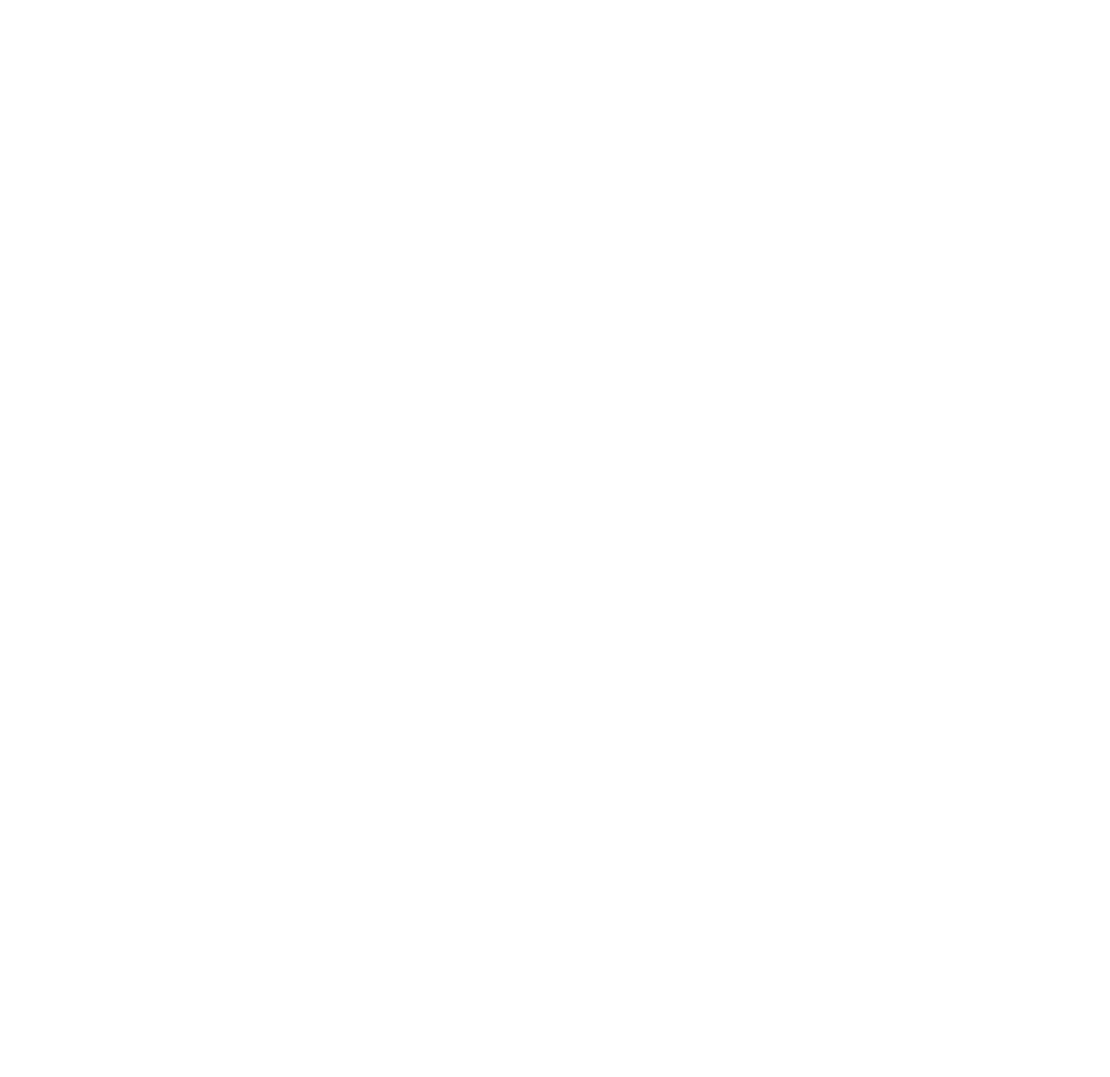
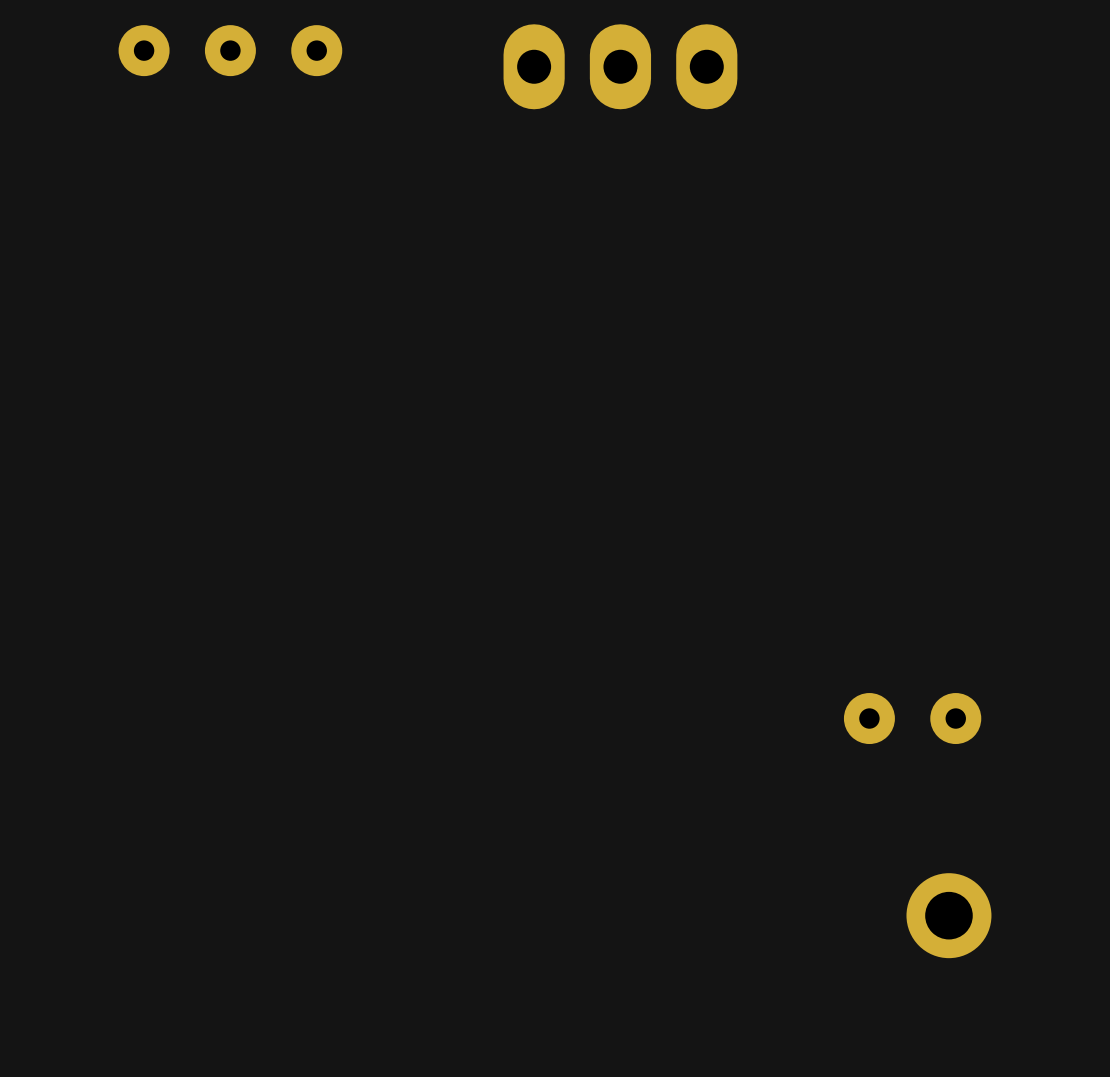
part: none -> (230, 50)
part: none -> (620, 66)
part: none -> (912, 718)
part: none -> (948, 915)

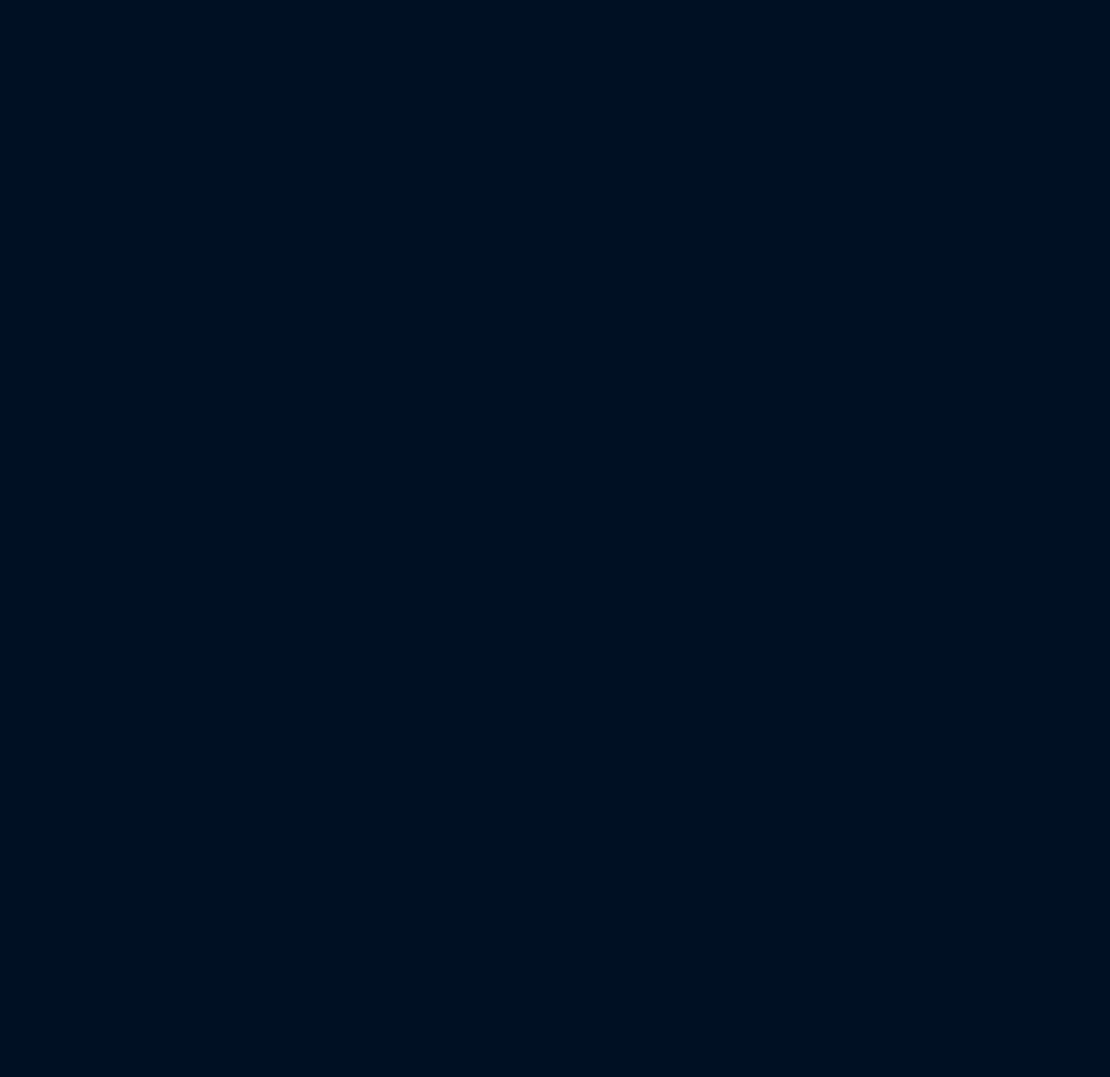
part: (230, 50) -> none
part: (620, 66) -> none
part: (912, 718) -> none
part: (948, 915) -> none

